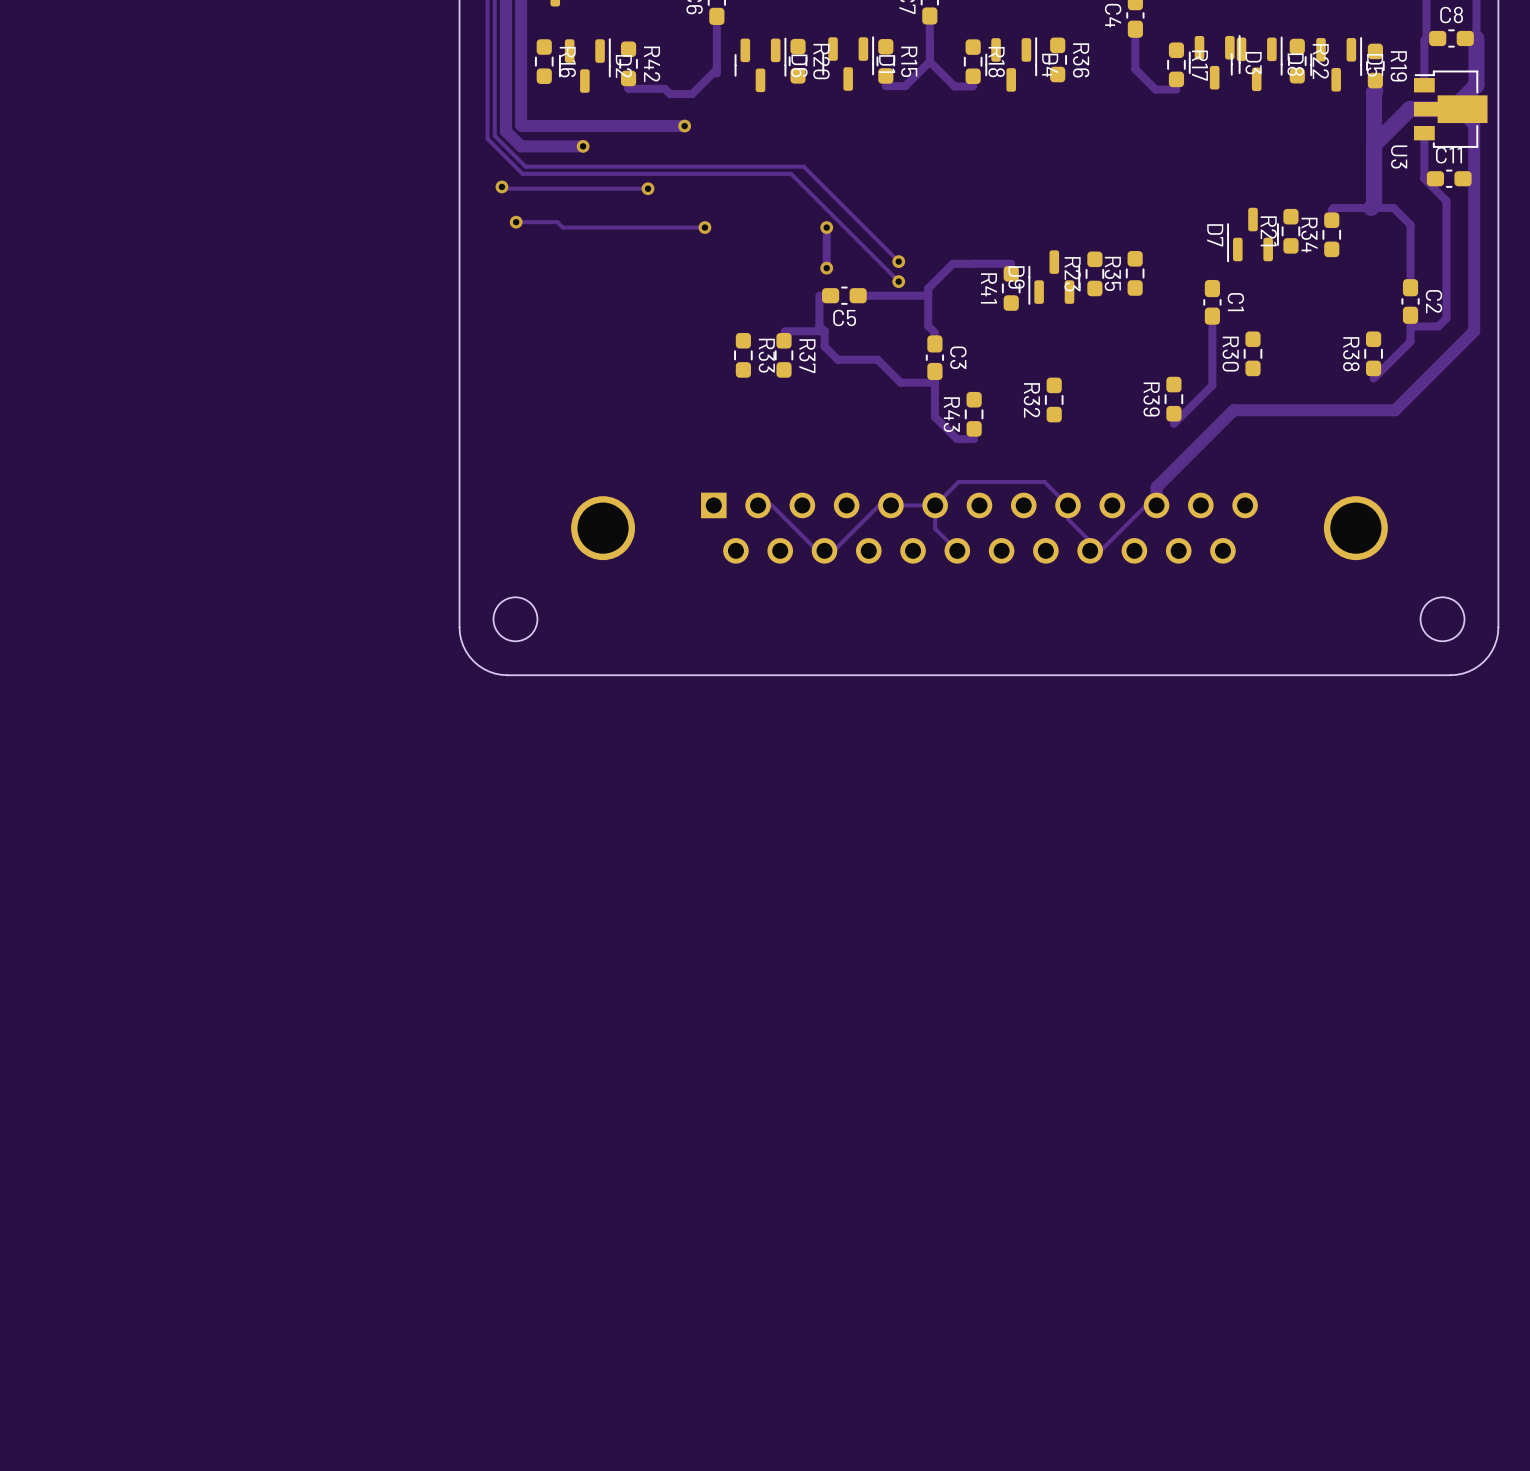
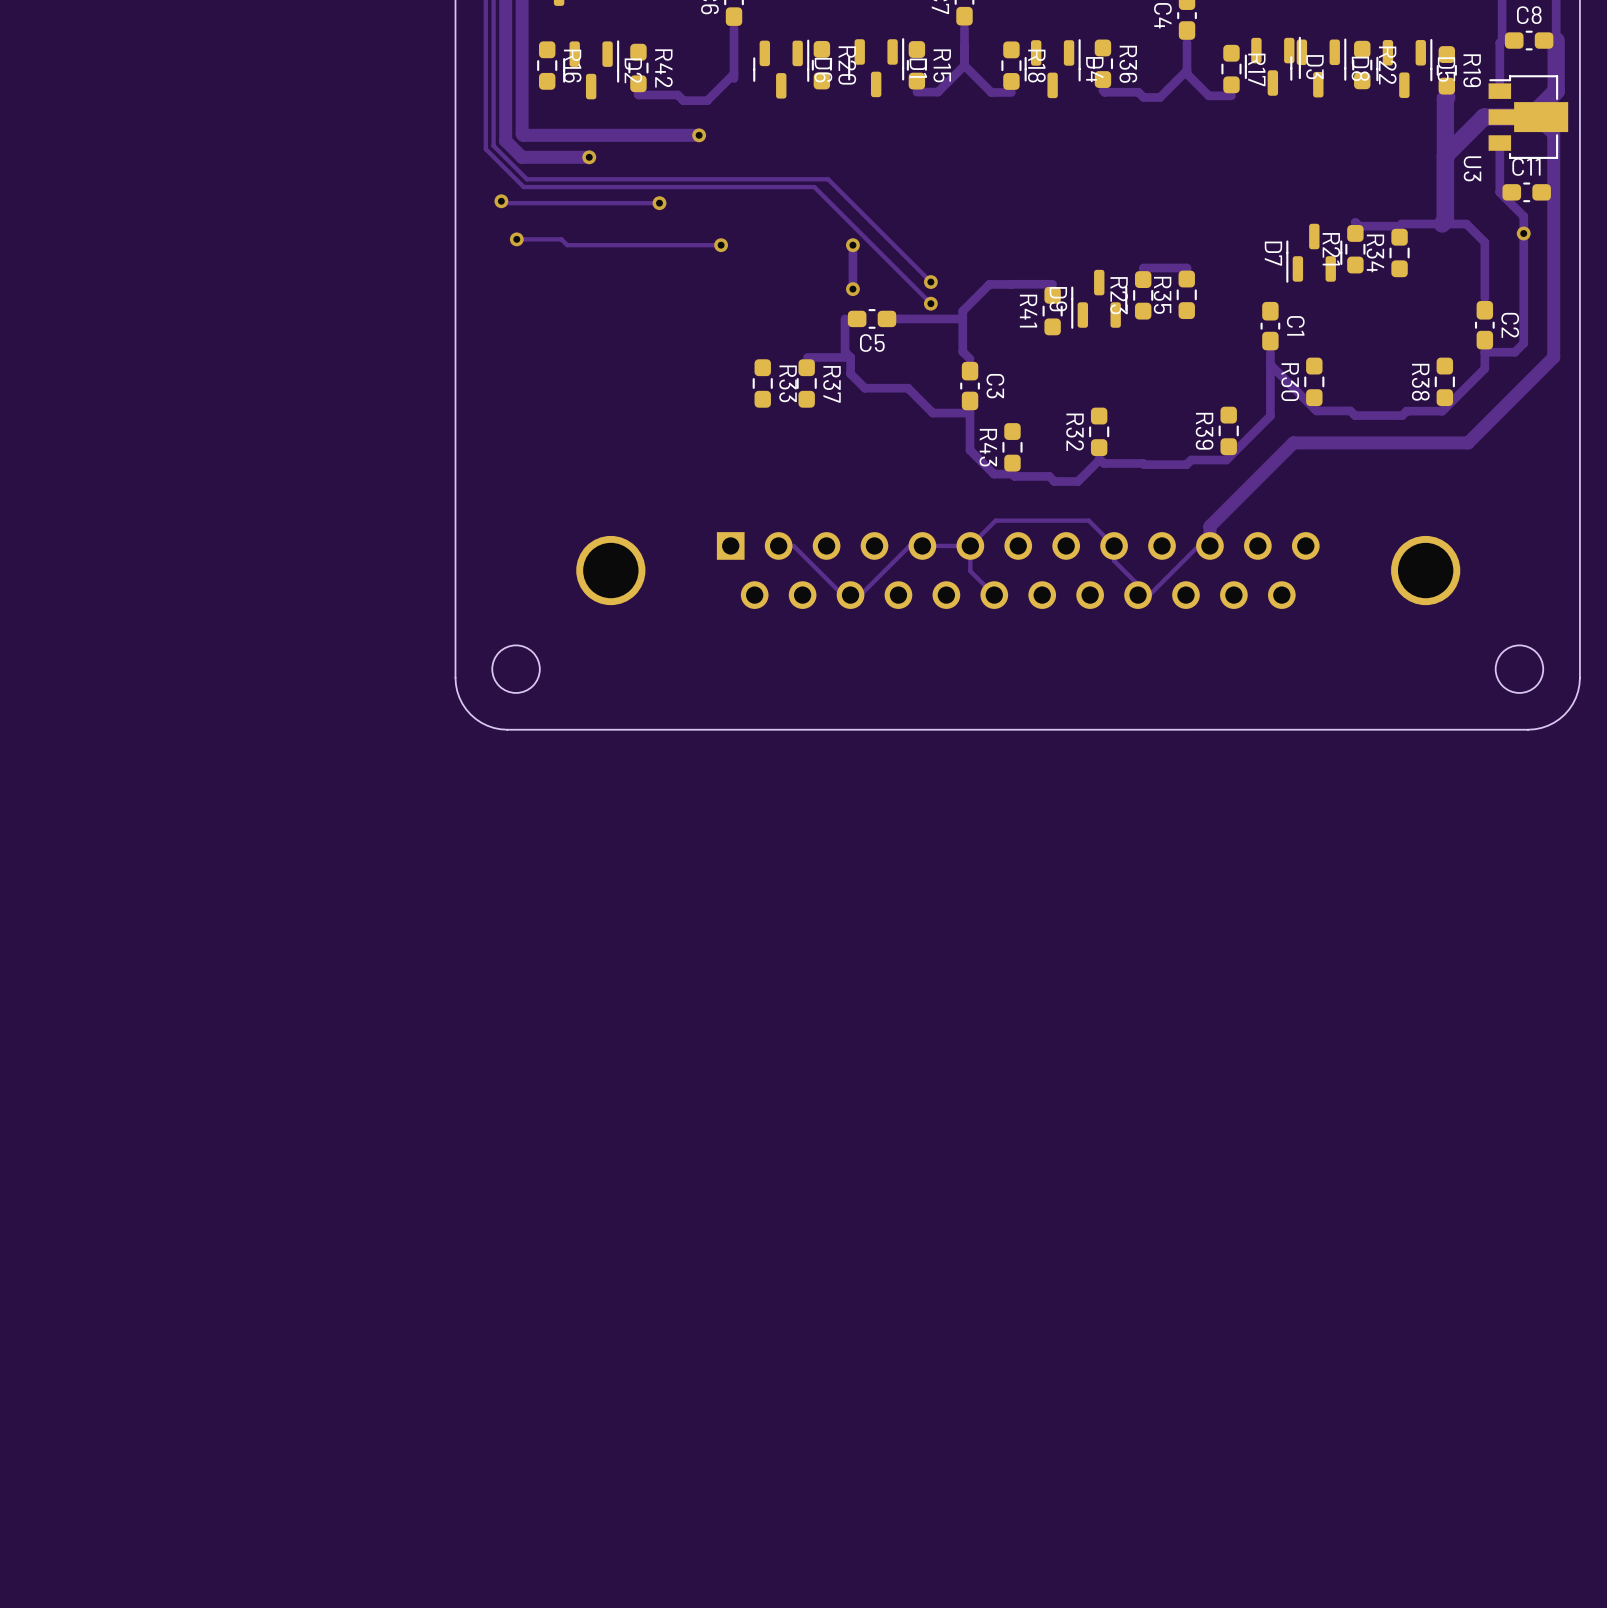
track: none -> (1187, 70) (1160, 97) (1143, 97) (1138, 92) (1104, 92) (1102, 90)
track: none -> (1355, 222) (1359, 226) (1399, 226)
via: none -> (1523, 233)
track: none -> (1187, 268) (1143, 268)
track: none -> (1270, 353) (1270, 364) (1316, 410) (1350, 410) (1355, 415) (1402, 415) (1406, 411) (1442, 411) (1444, 408)
track: none -> (1228, 457) (1226, 460) (1191, 460) (1186, 464) (1103, 463) (1099, 458)
track: none -> (1099, 460) (1078, 481) (1054, 481) (1049, 476) (1014, 476) (1012, 474)

